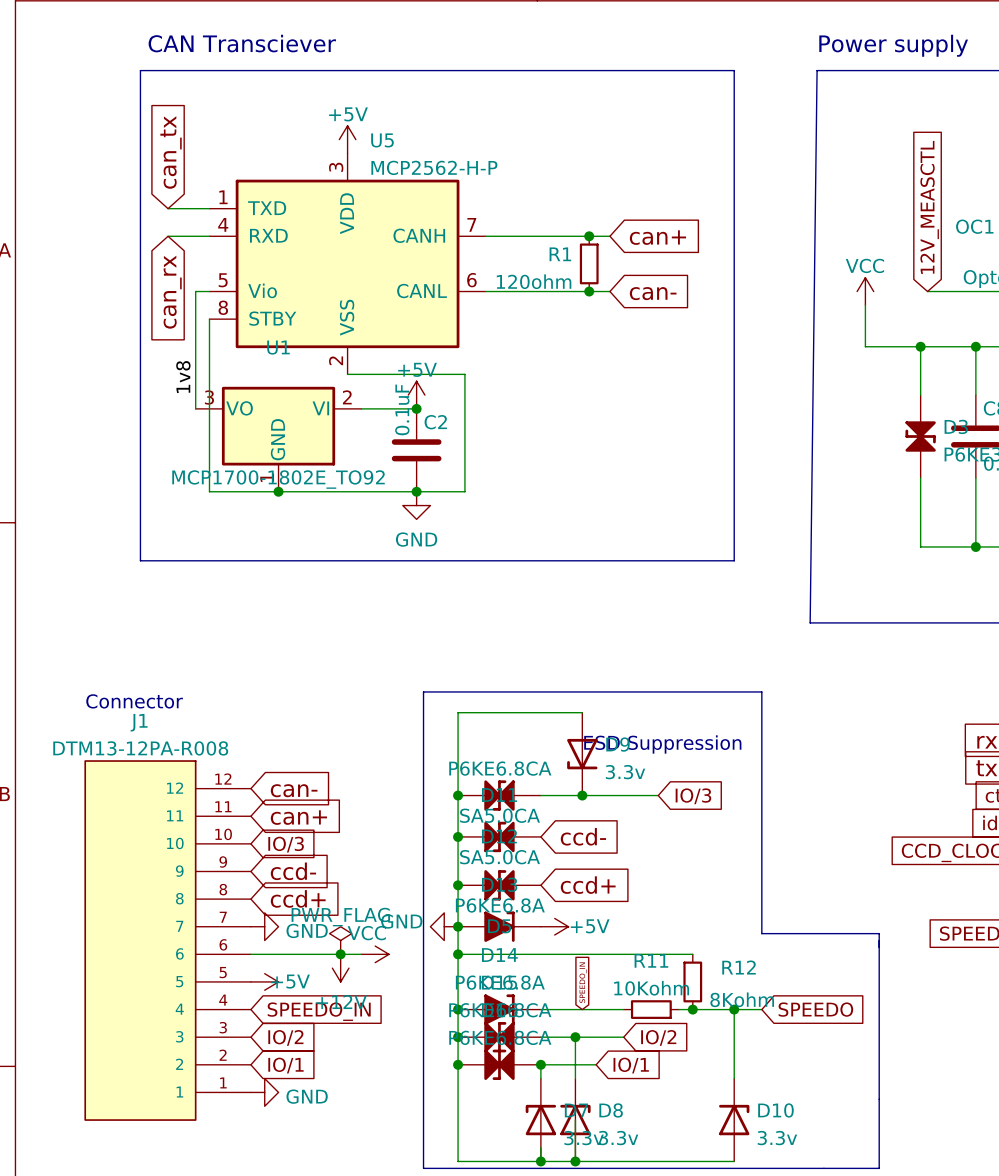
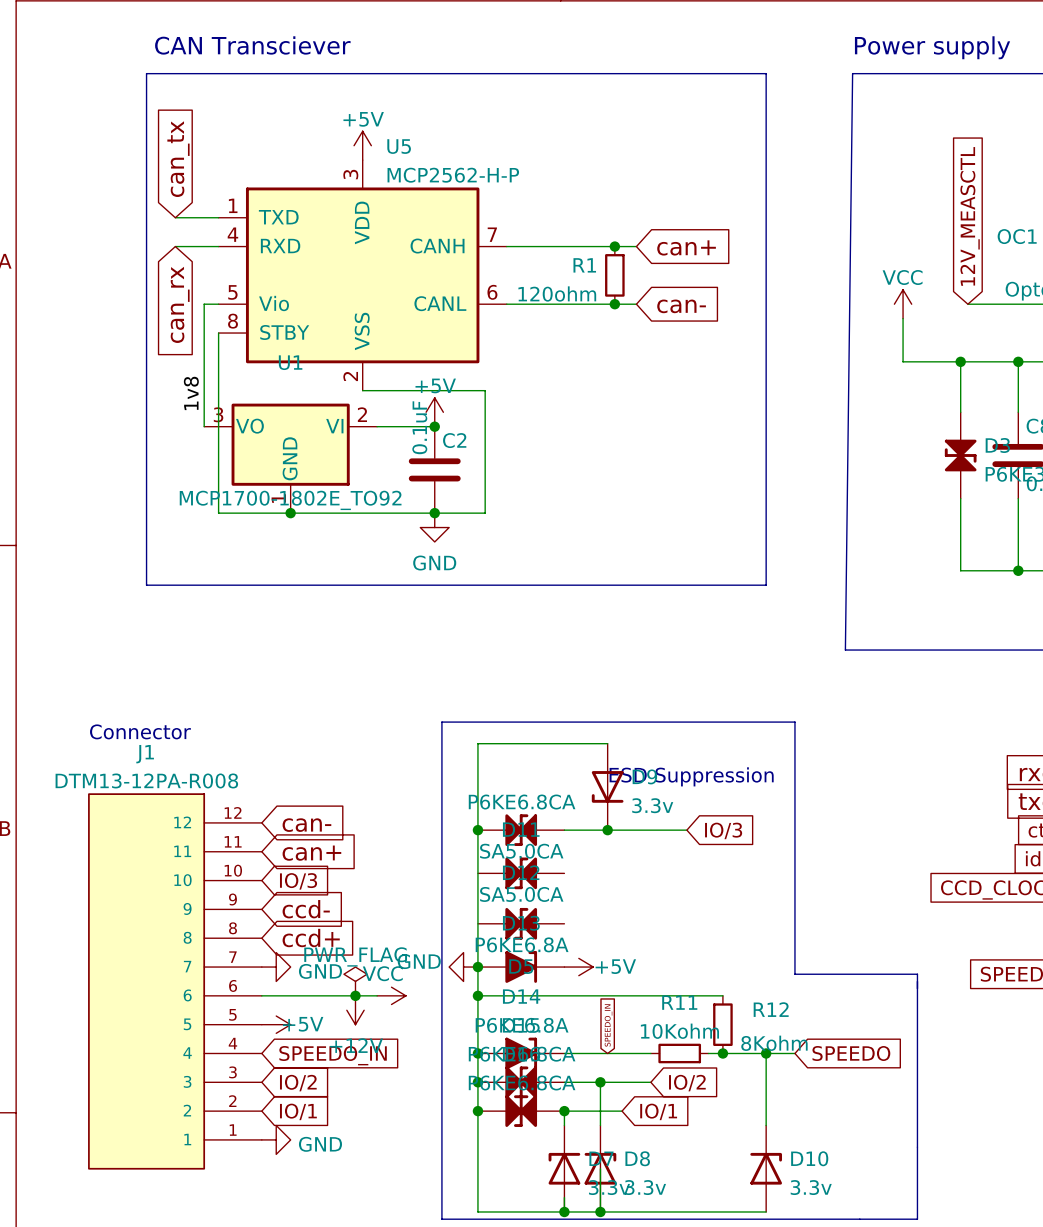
junction: (458, 836) -> none
global label: ccd- (583, 836) -> none
junction: (458, 885) -> none
global label: ccd+ (588, 885) -> none

